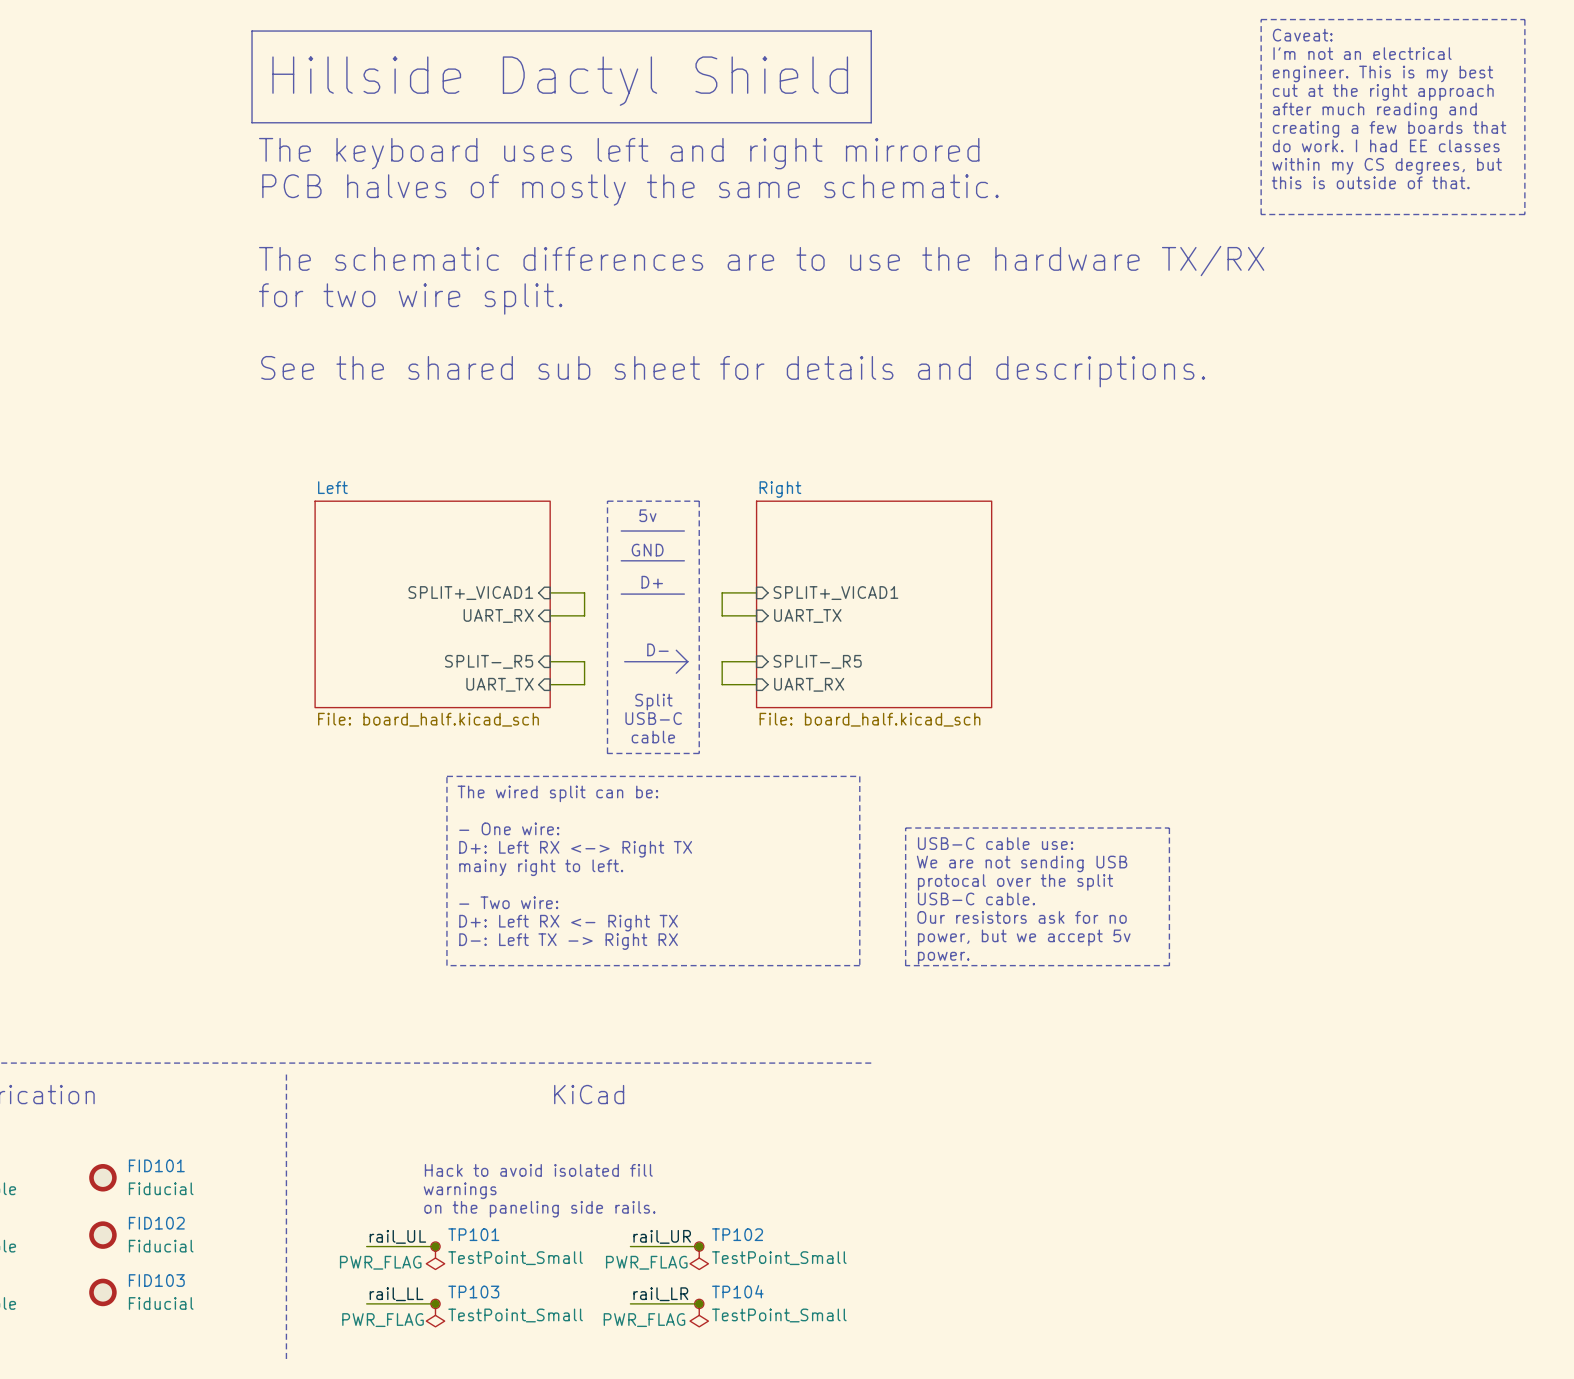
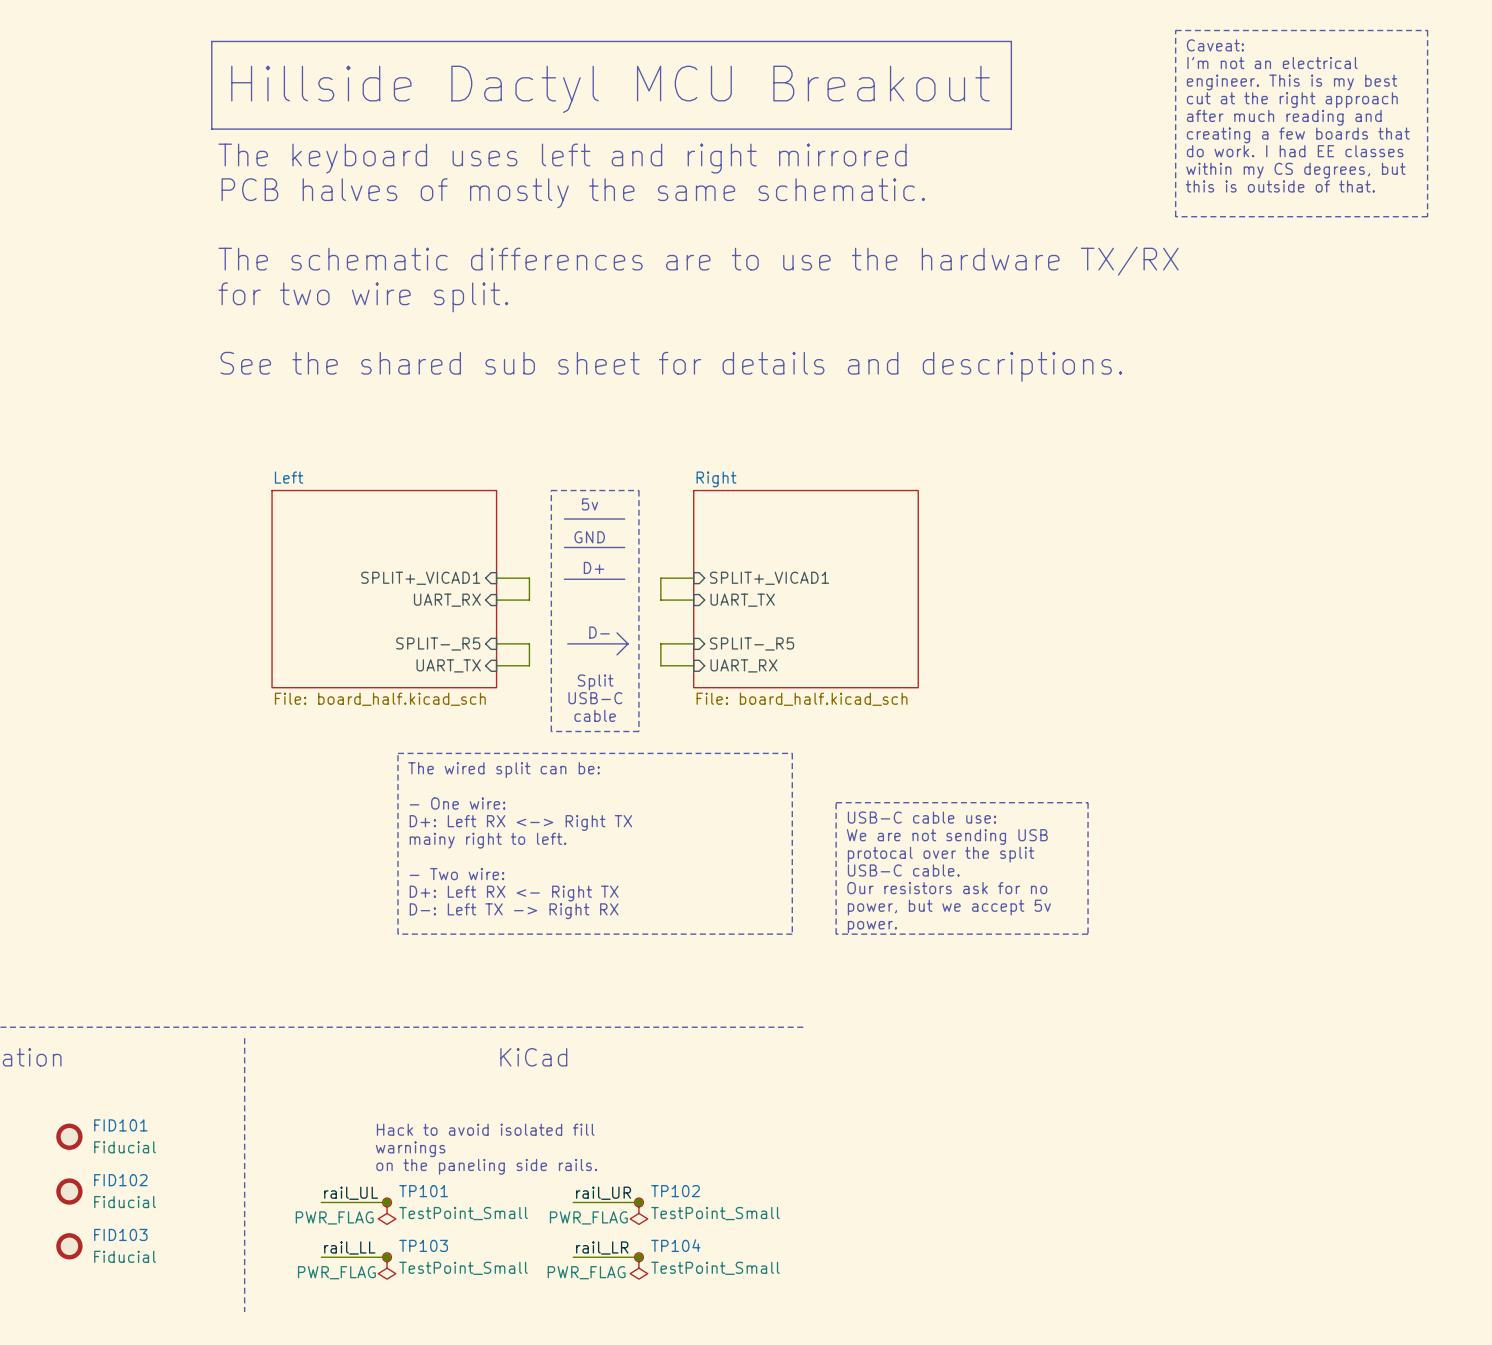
line: (871, 31) (871, 122) -> (803, 41) (1011, 41) (1011, 129) (803, 129)
text: Hillside Dactyl Shield (560, 81) -> Hillside Dactyl MCU Breakout (610, 89)

